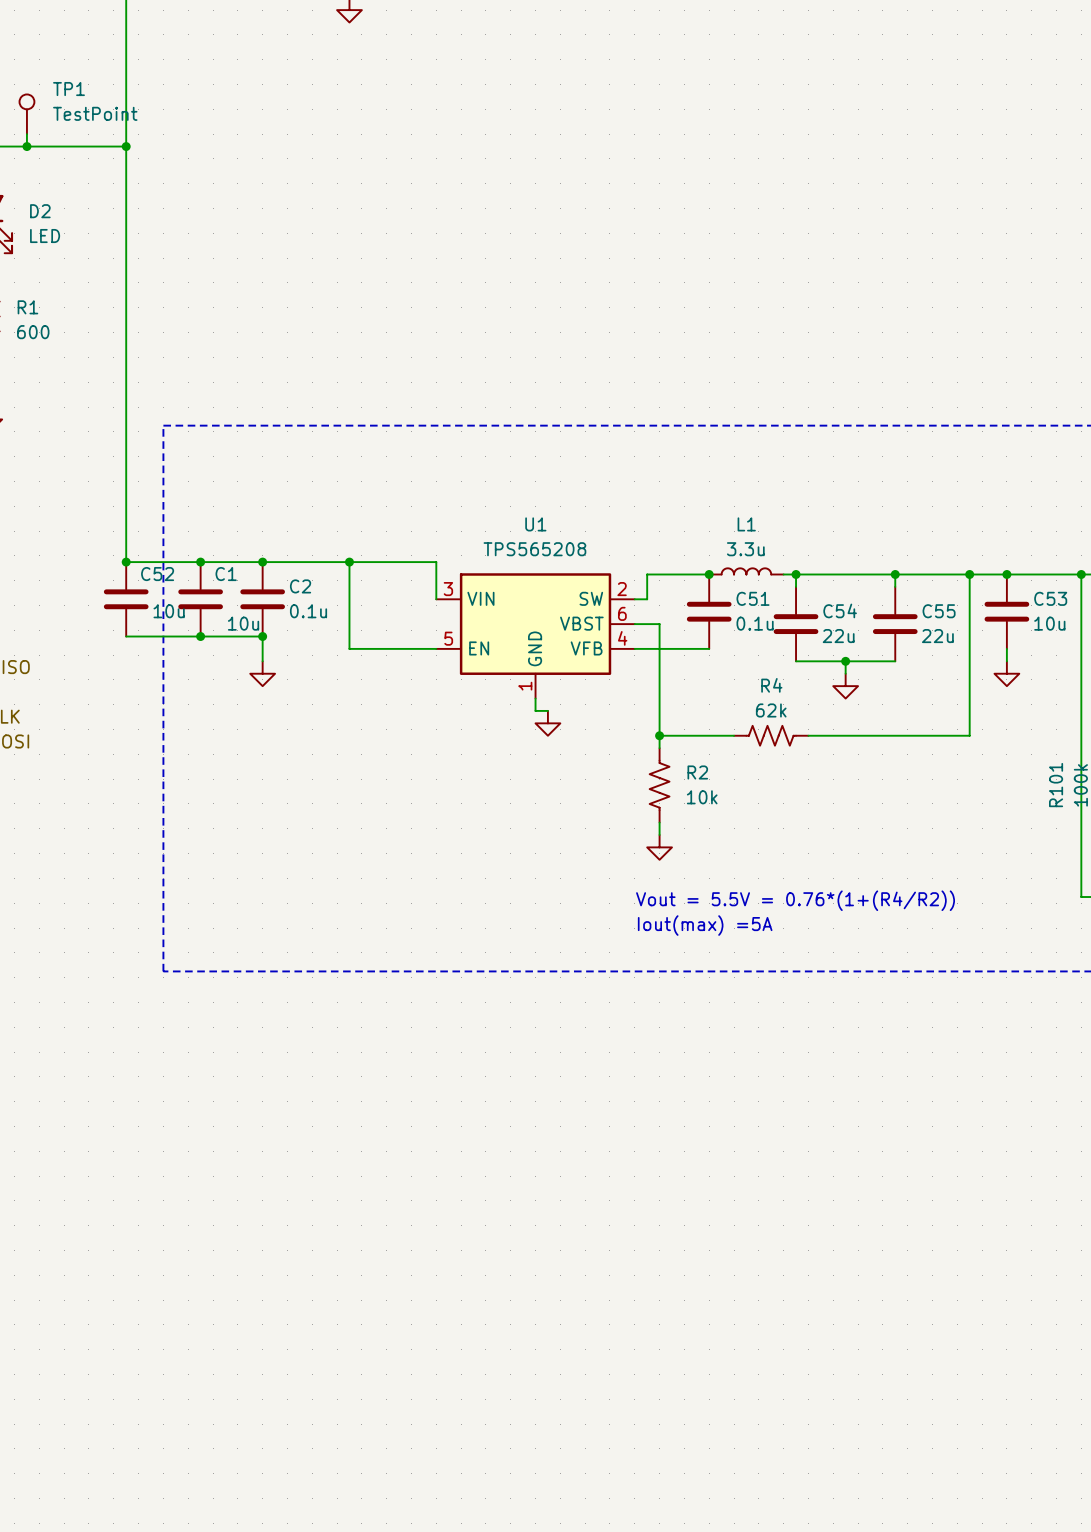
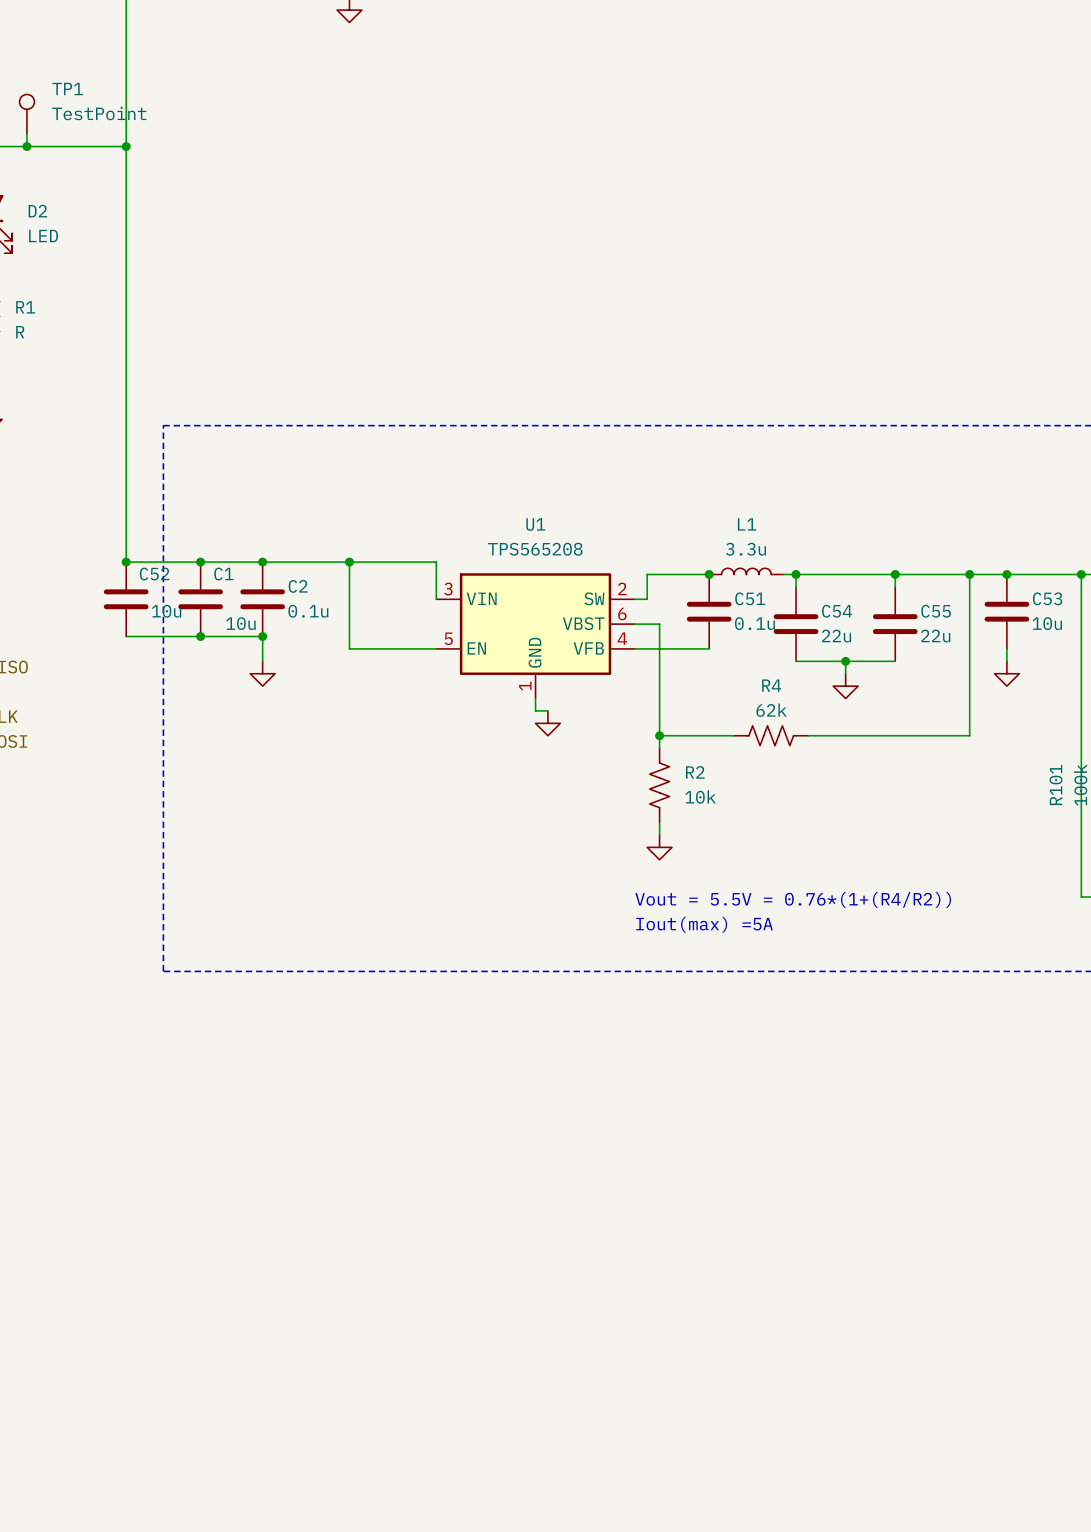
R1 value: 600 (33, 332) -> R (20, 332)

